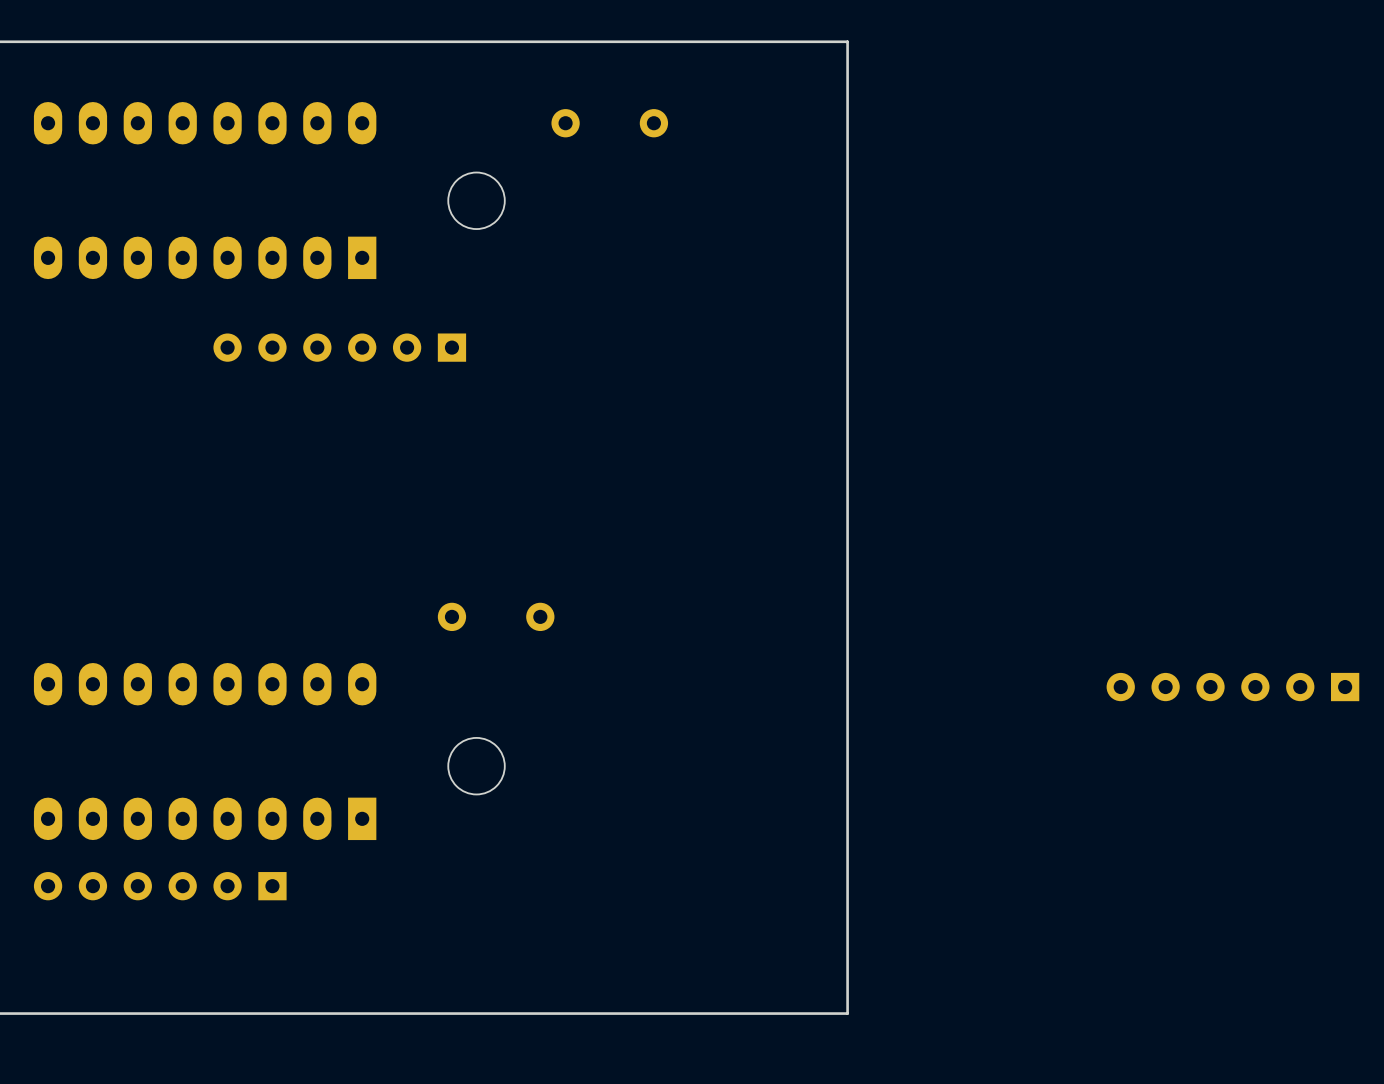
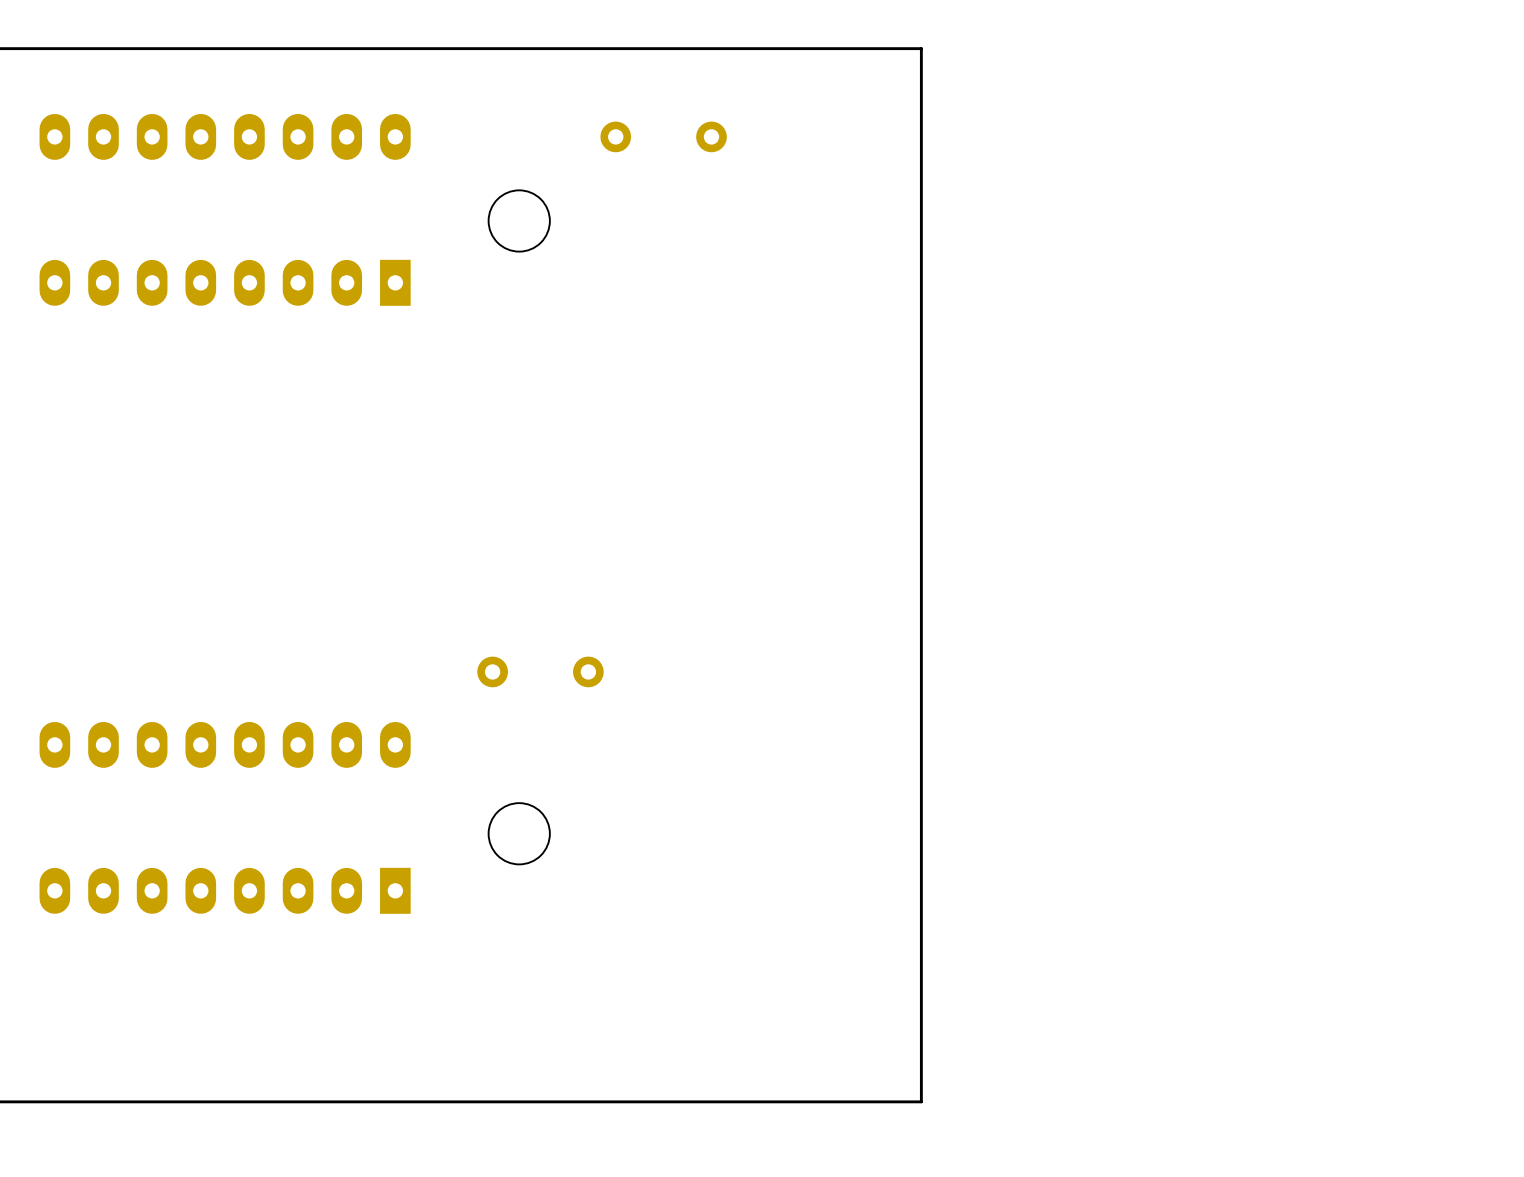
part: (339, 347) -> none
part: (1232, 687) -> none
part: (160, 886) -> none

